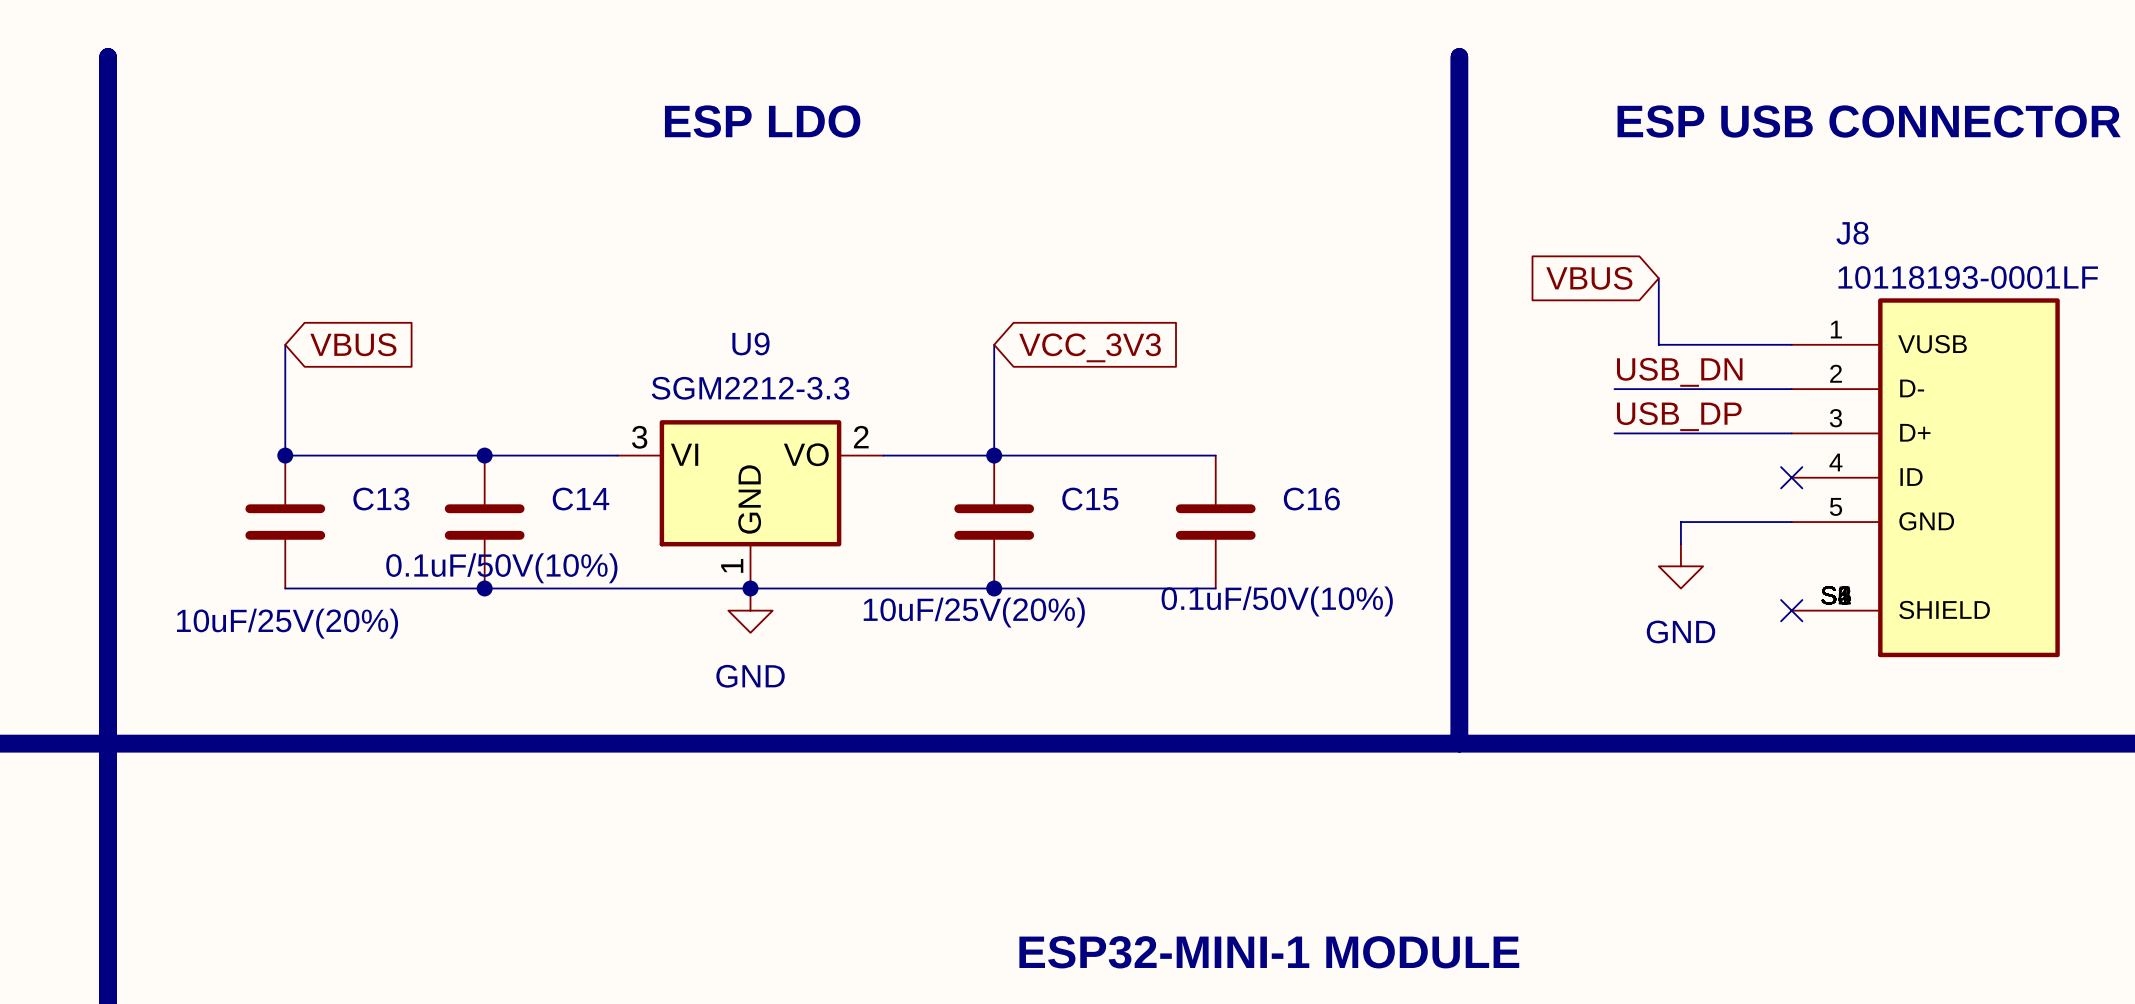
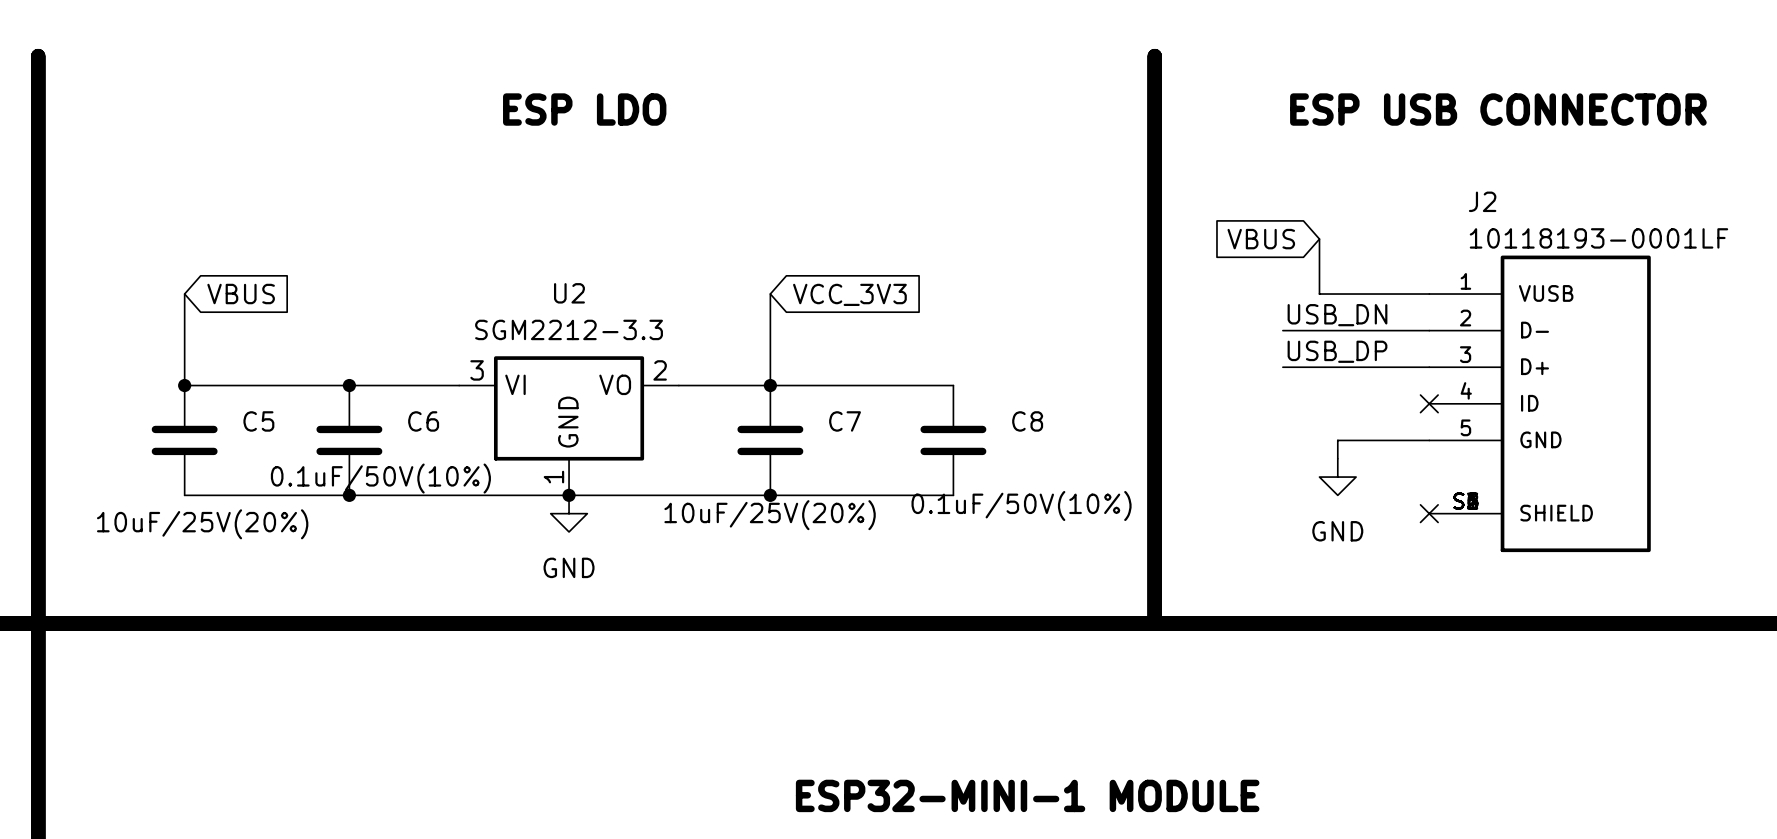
J8 name: J8 (1852, 233) -> J2 (1482, 201)
U9 name: U9 (750, 343) -> U2 (569, 293)
C13 name: C13 (381, 499) -> C5 (258, 421)
C14 name: C14 (581, 499) -> C6 (423, 421)
C15 name: C15 (1090, 499) -> C7 (845, 421)
C16 name: C16 (1311, 499) -> C8 (1027, 421)

